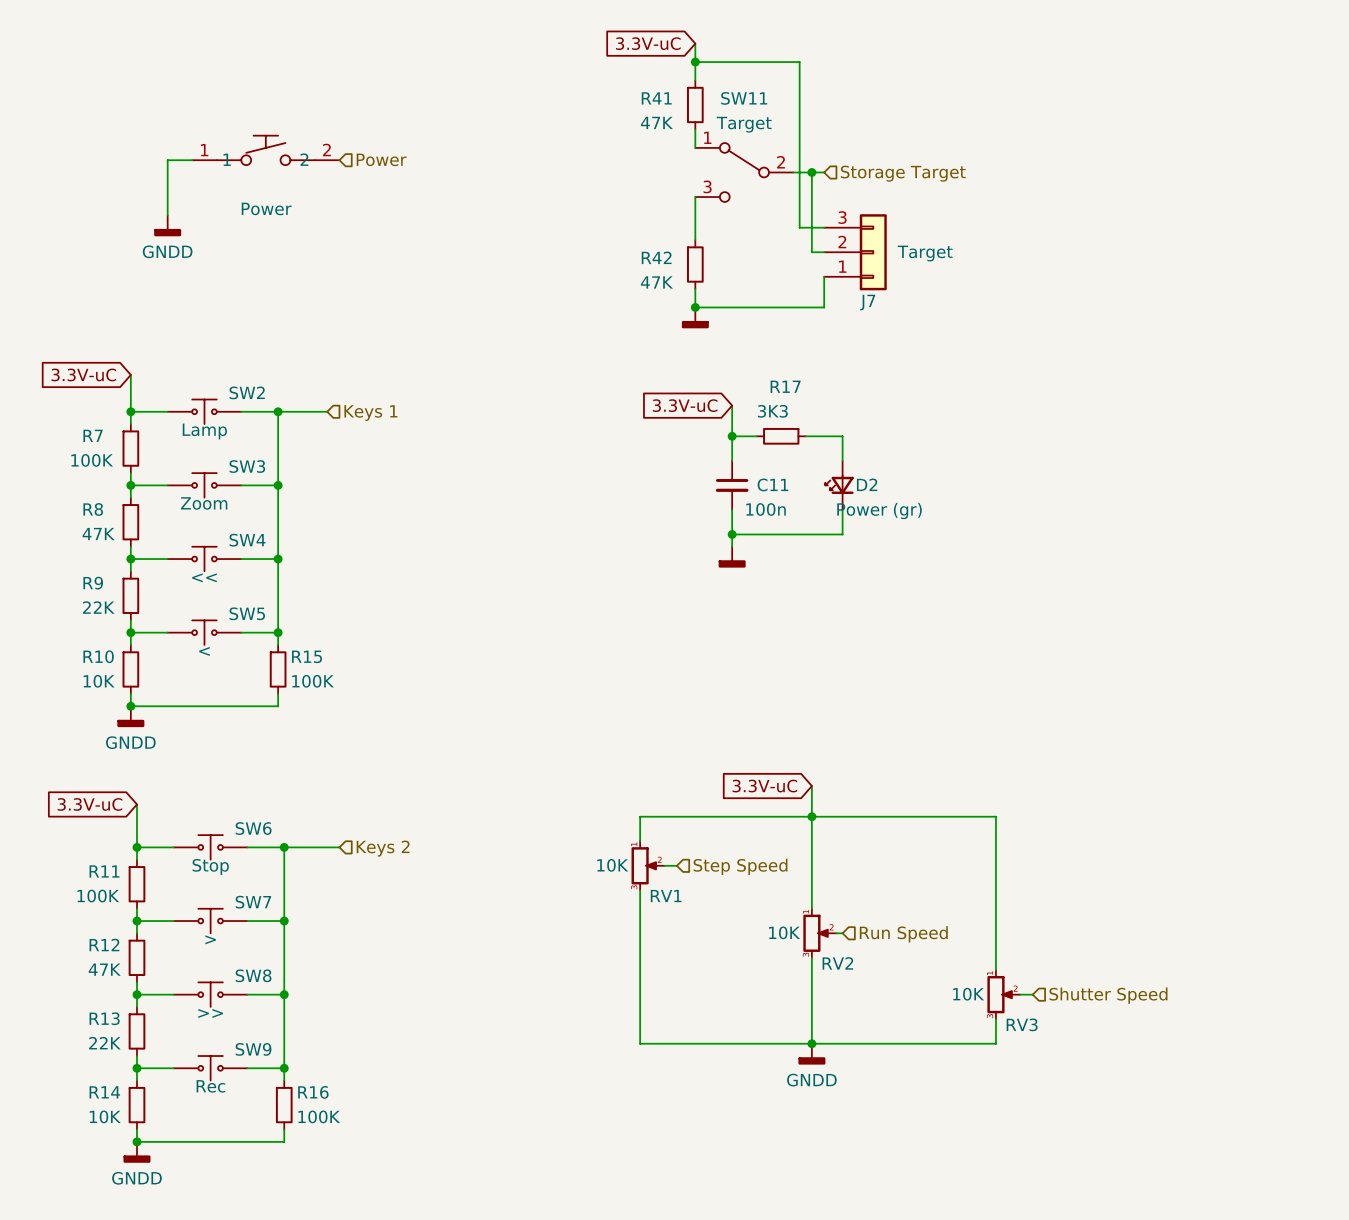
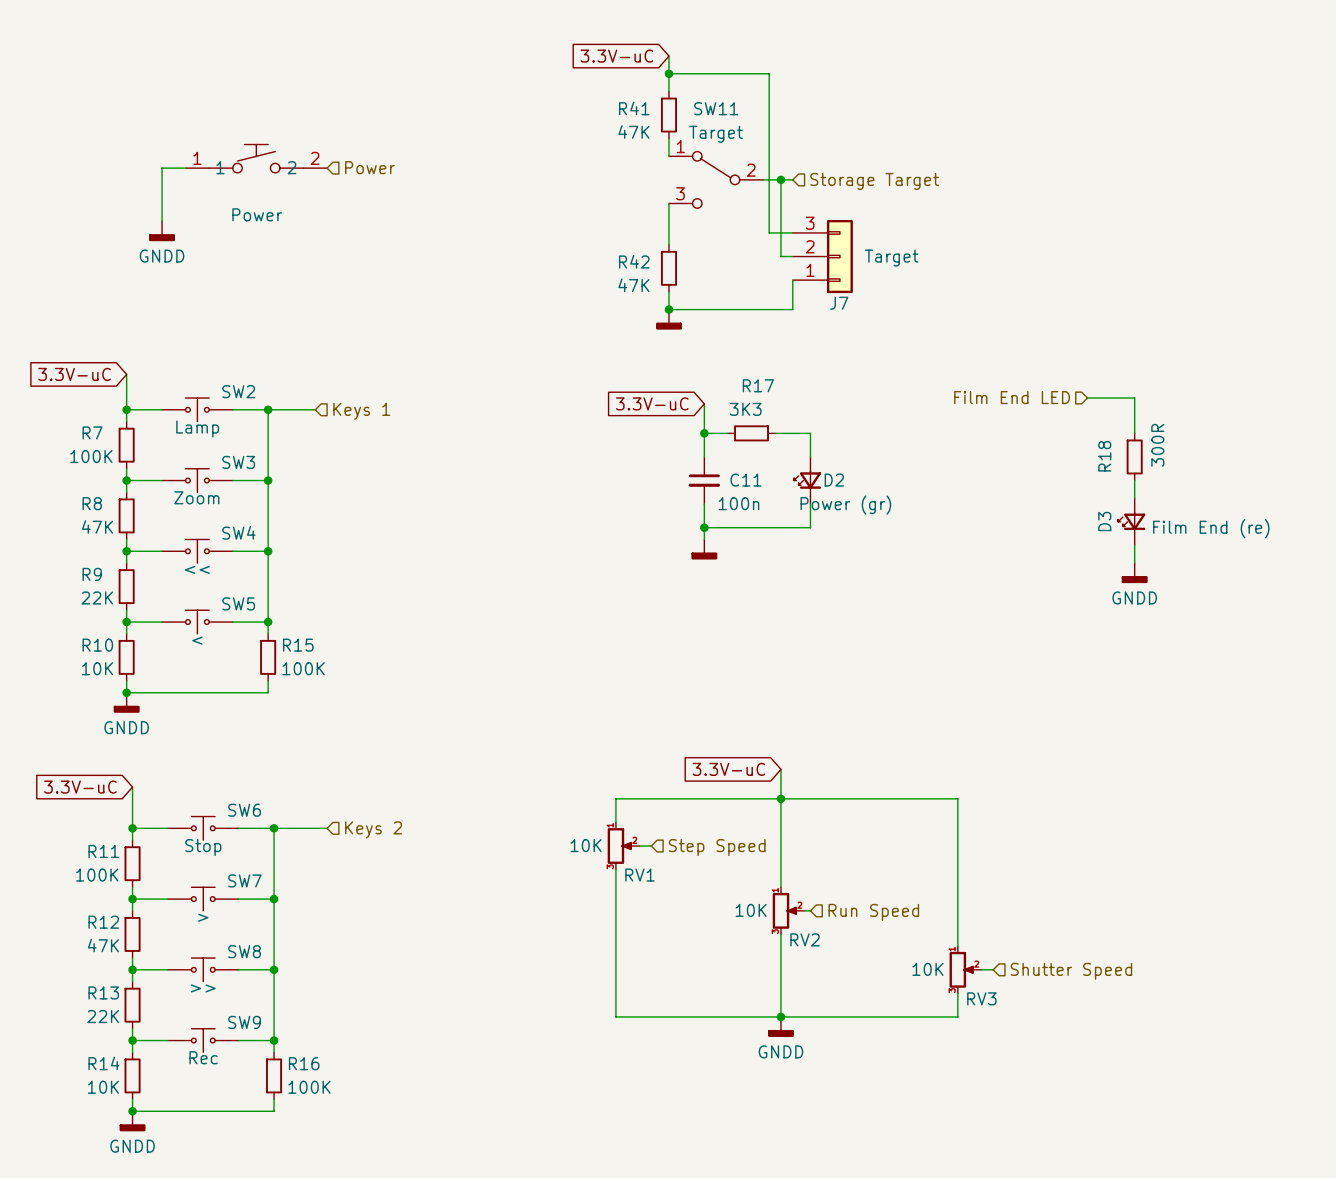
hierarchical label: none -> Film End LED (1012, 397)
wire: none -> (1087, 398) (1134, 398) (1134, 433)
R18: none -> 300R (1134, 456)
wire: none -> (1134, 480) (1134, 498)
D3: none -> Film End (re) (1131, 521)
wire: none -> (1134, 545) (1134, 563)
power symbol: none -> GNDD (1134, 573)

